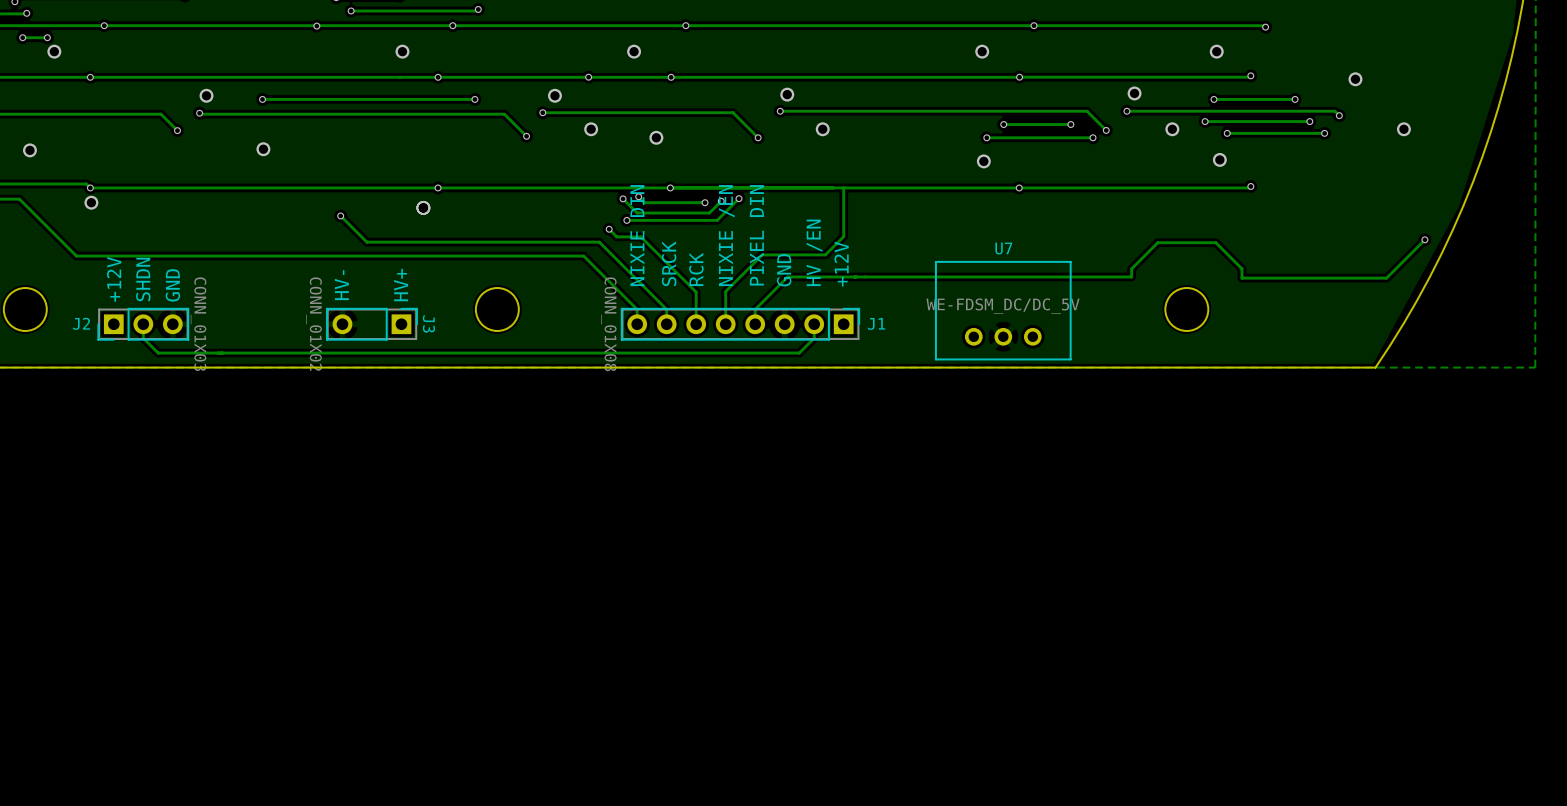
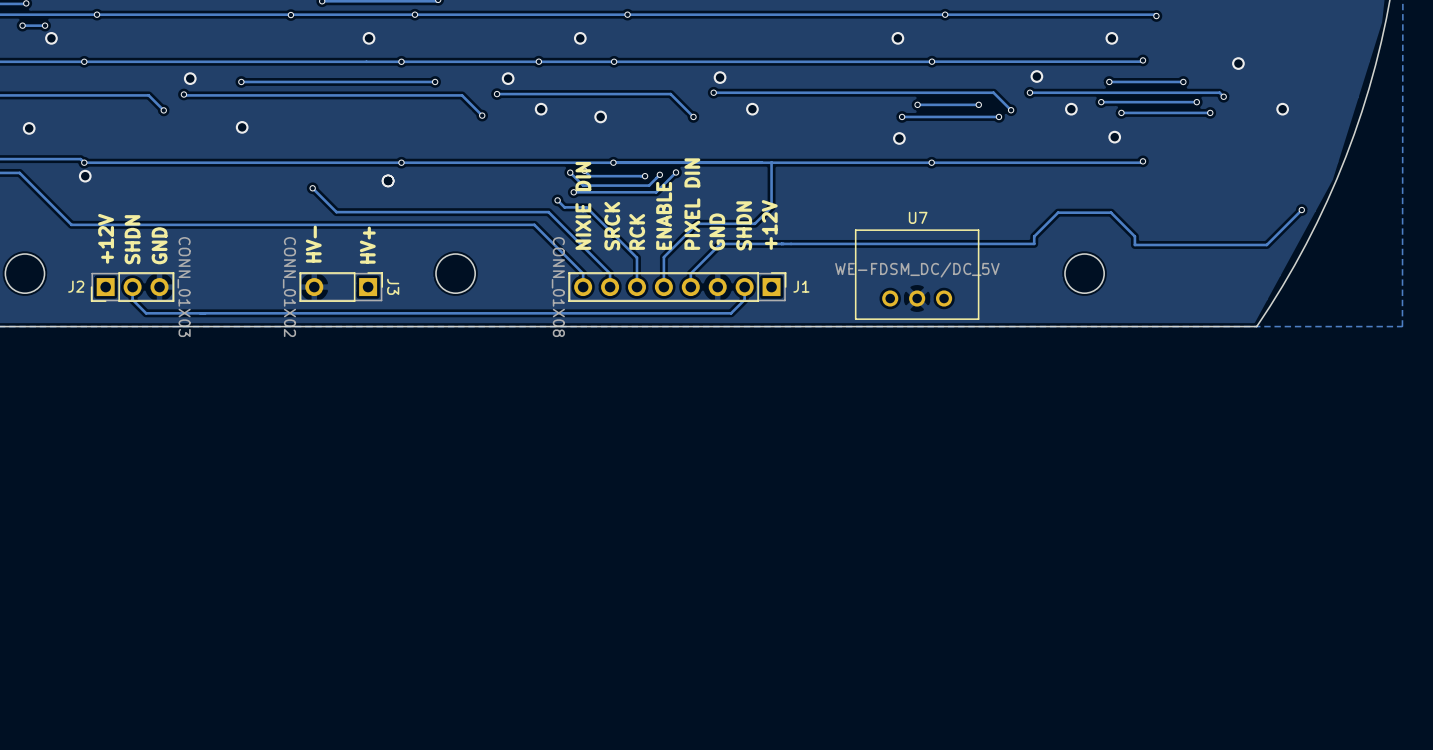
text: NIXIE /EN (726, 235) -> ENABLE (664, 215)
text: HV /EN (814, 252) -> SHDN (744, 225)

